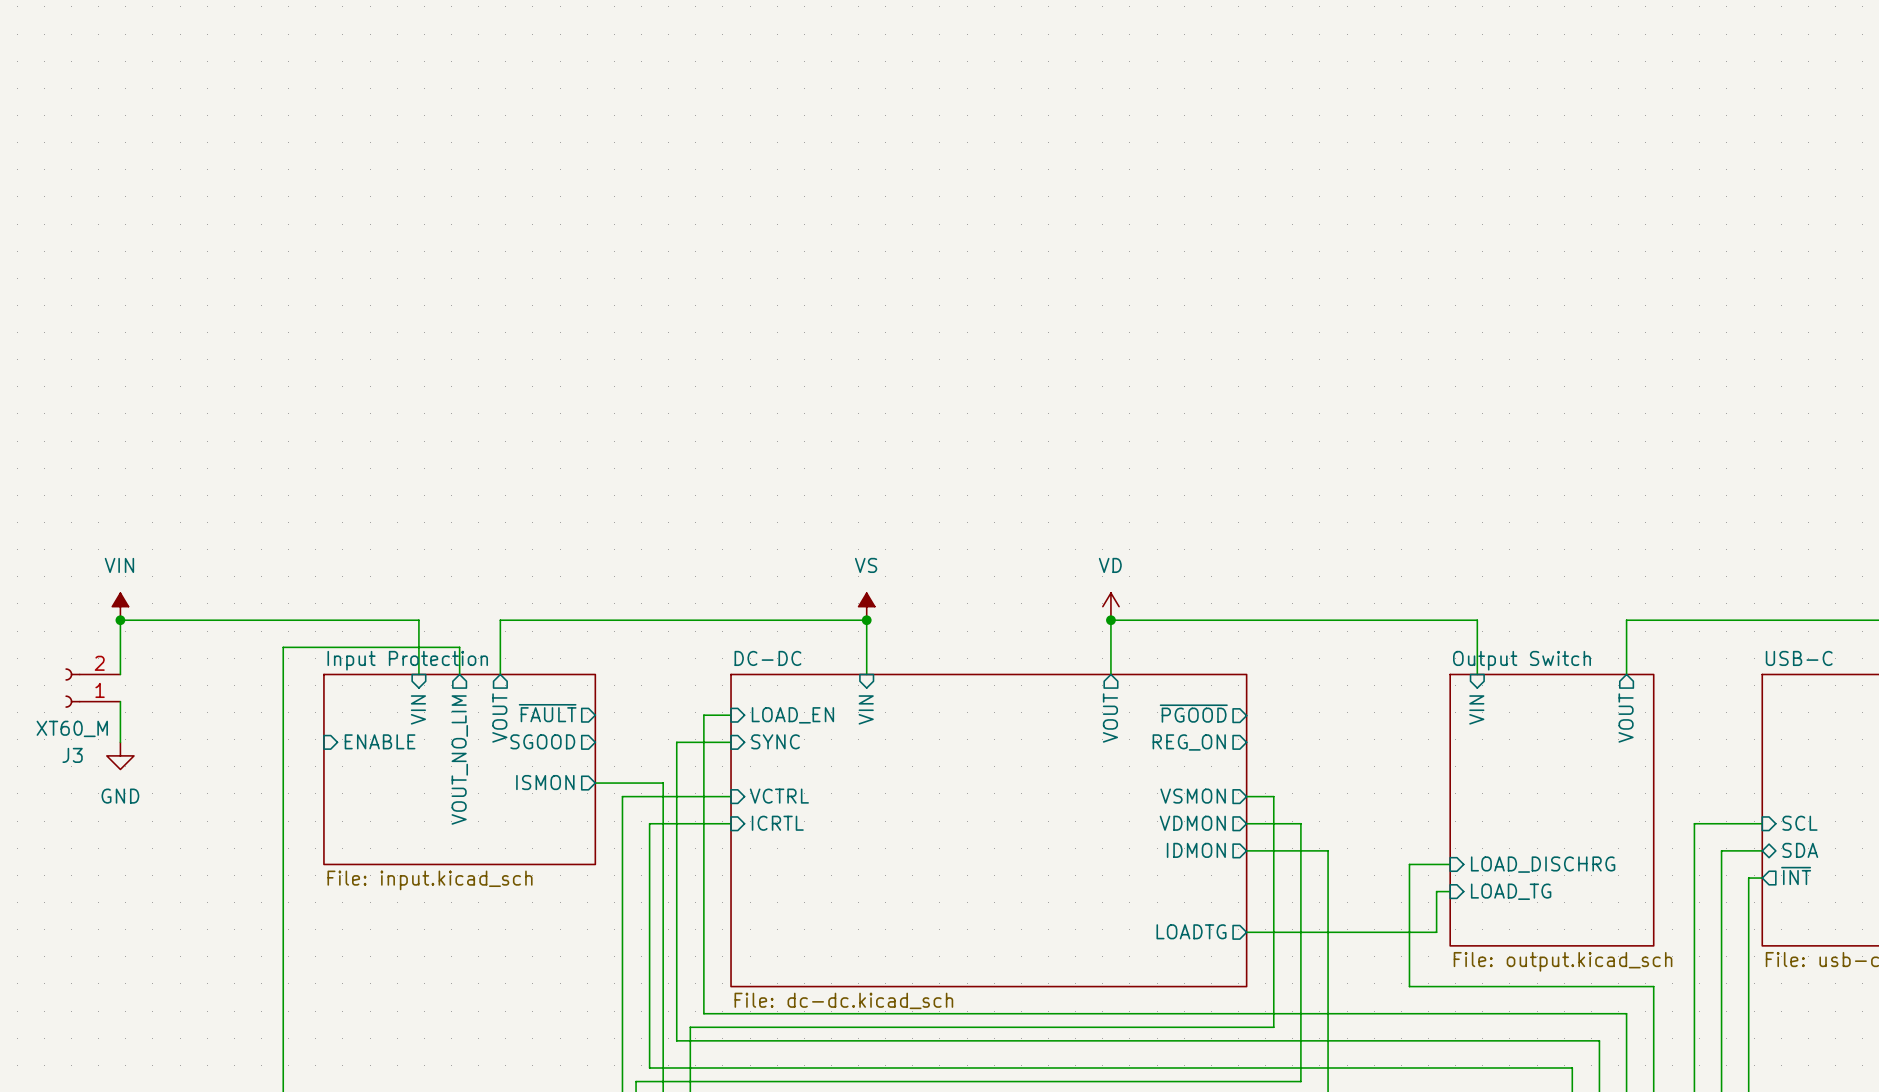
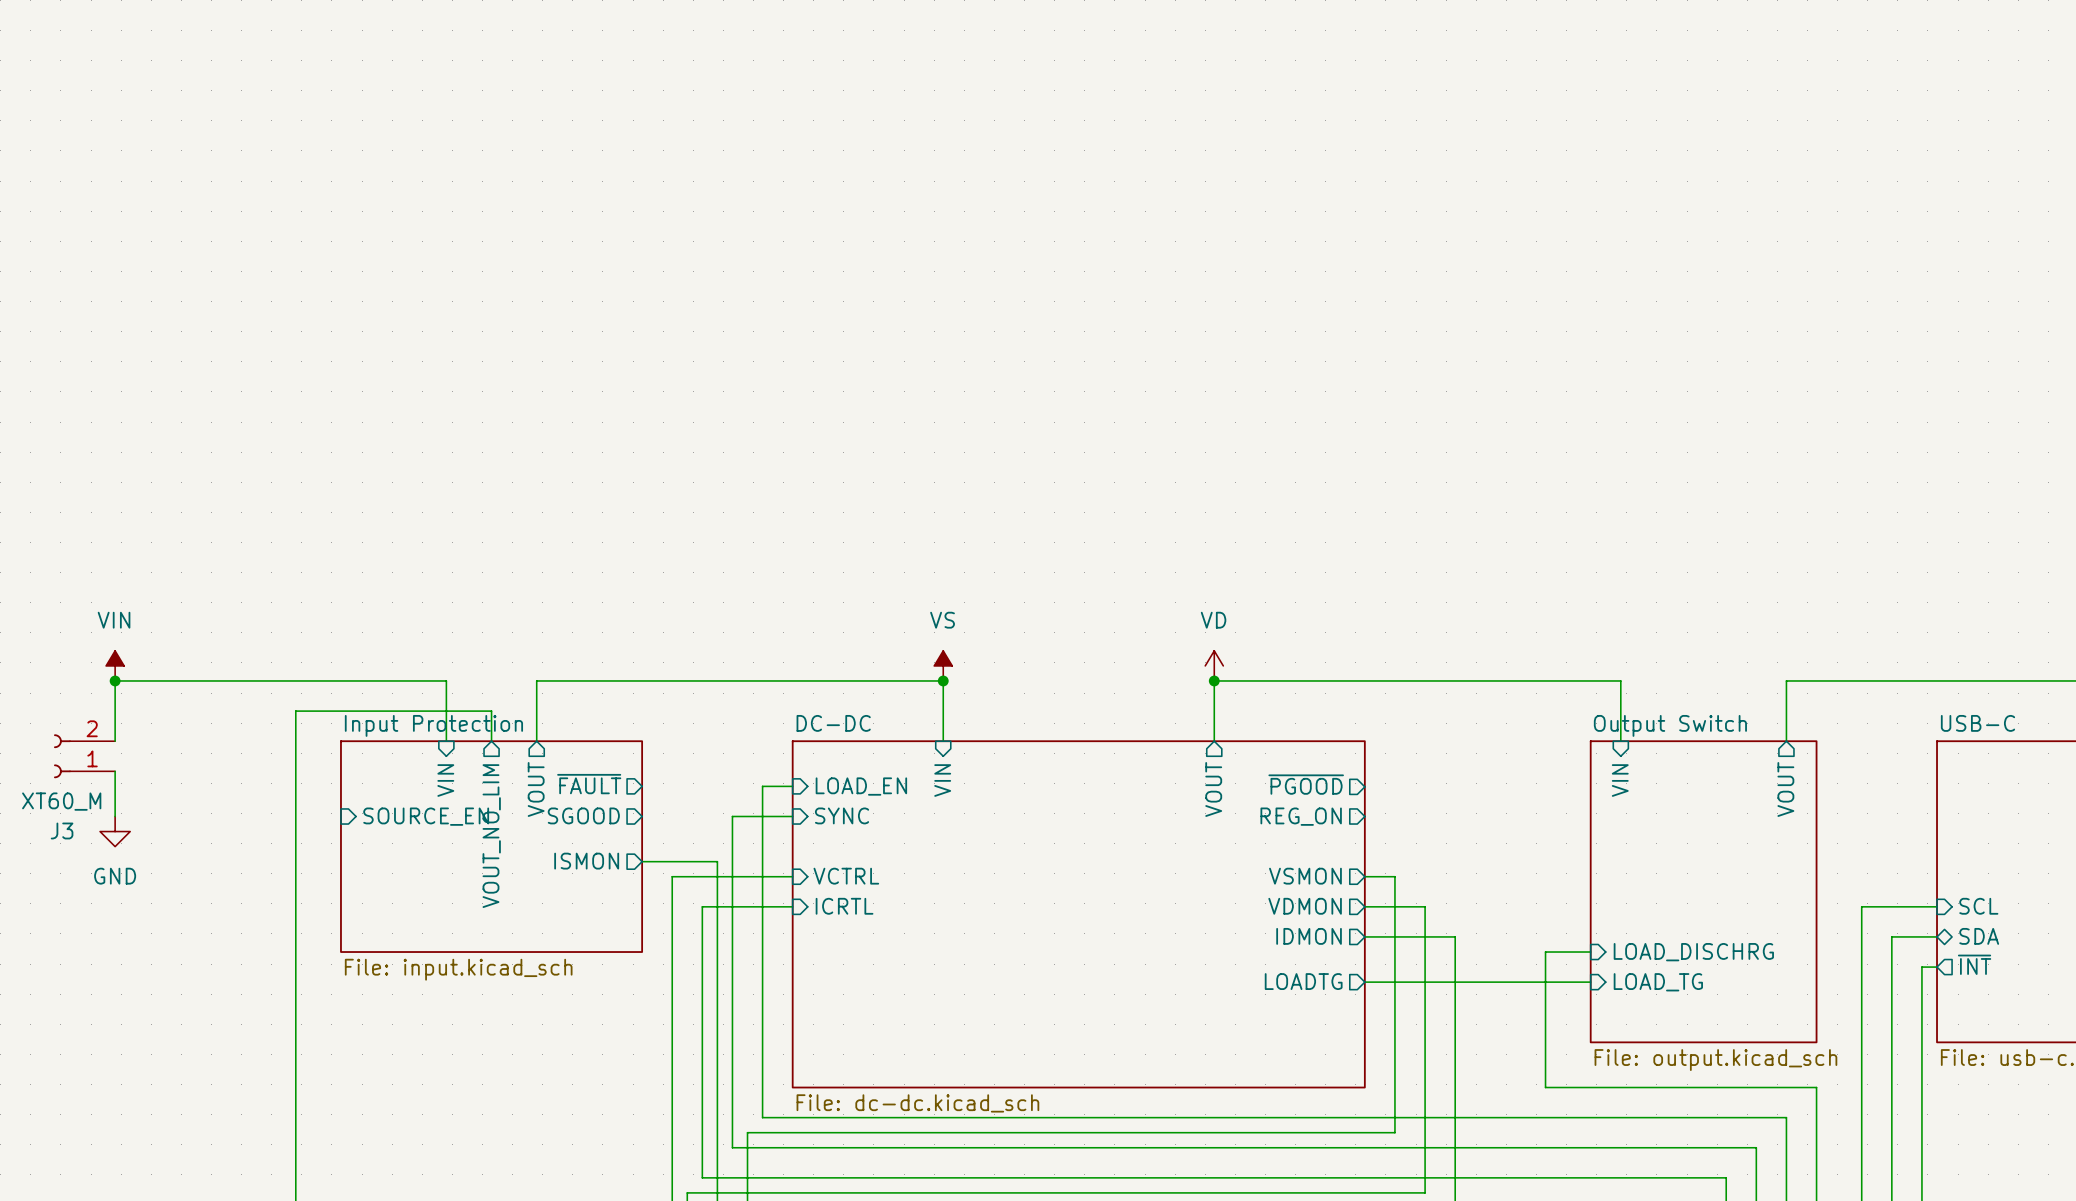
sheet pin: ENABLE (380, 741) -> SOURCE_EN (426, 816)
wire: (1436, 891) (1436, 932) (1246, 932) -> (1575, 982) (1364, 982)
sheet pin position: LOADTG (1191, 931) -> LOADTG (1303, 981)

